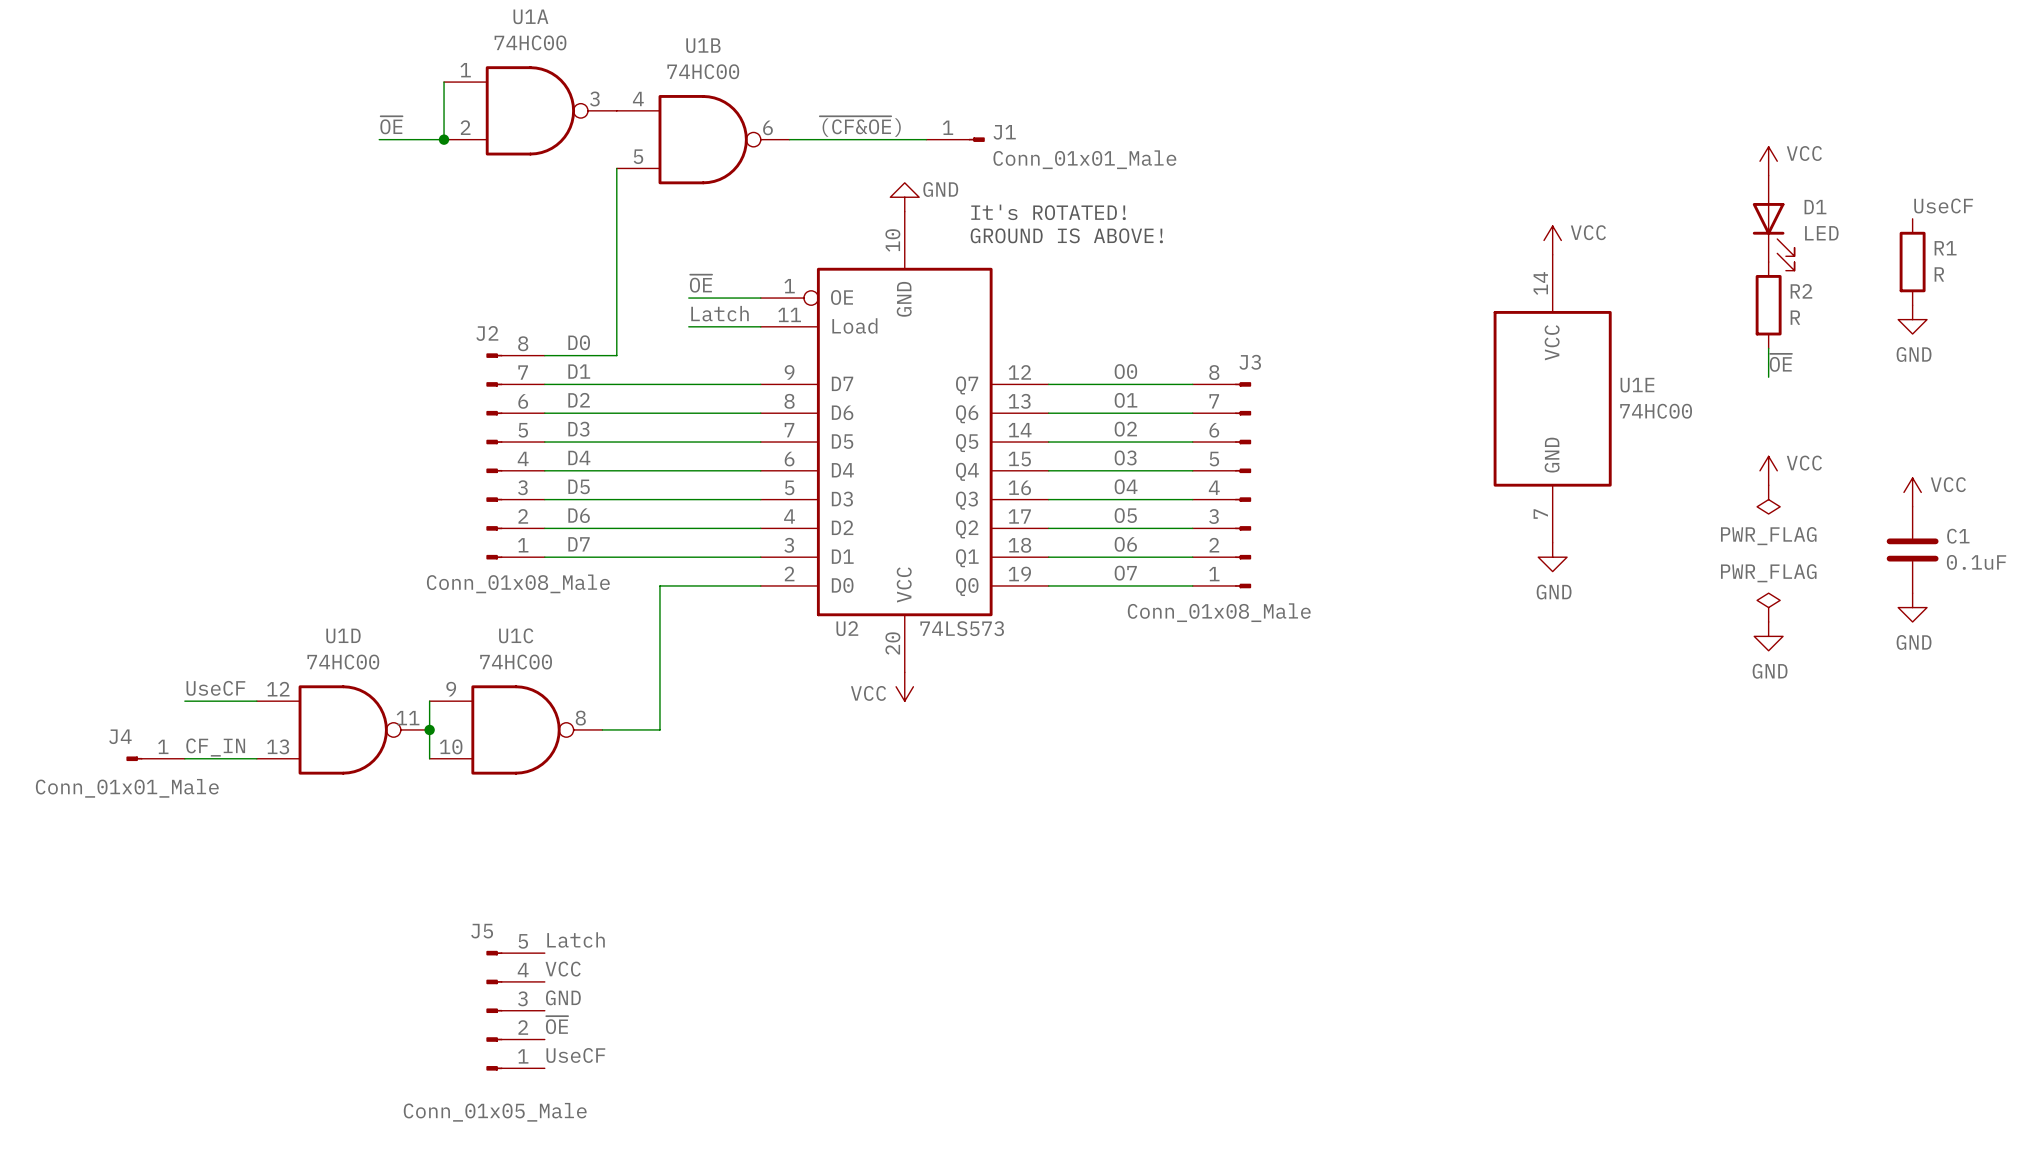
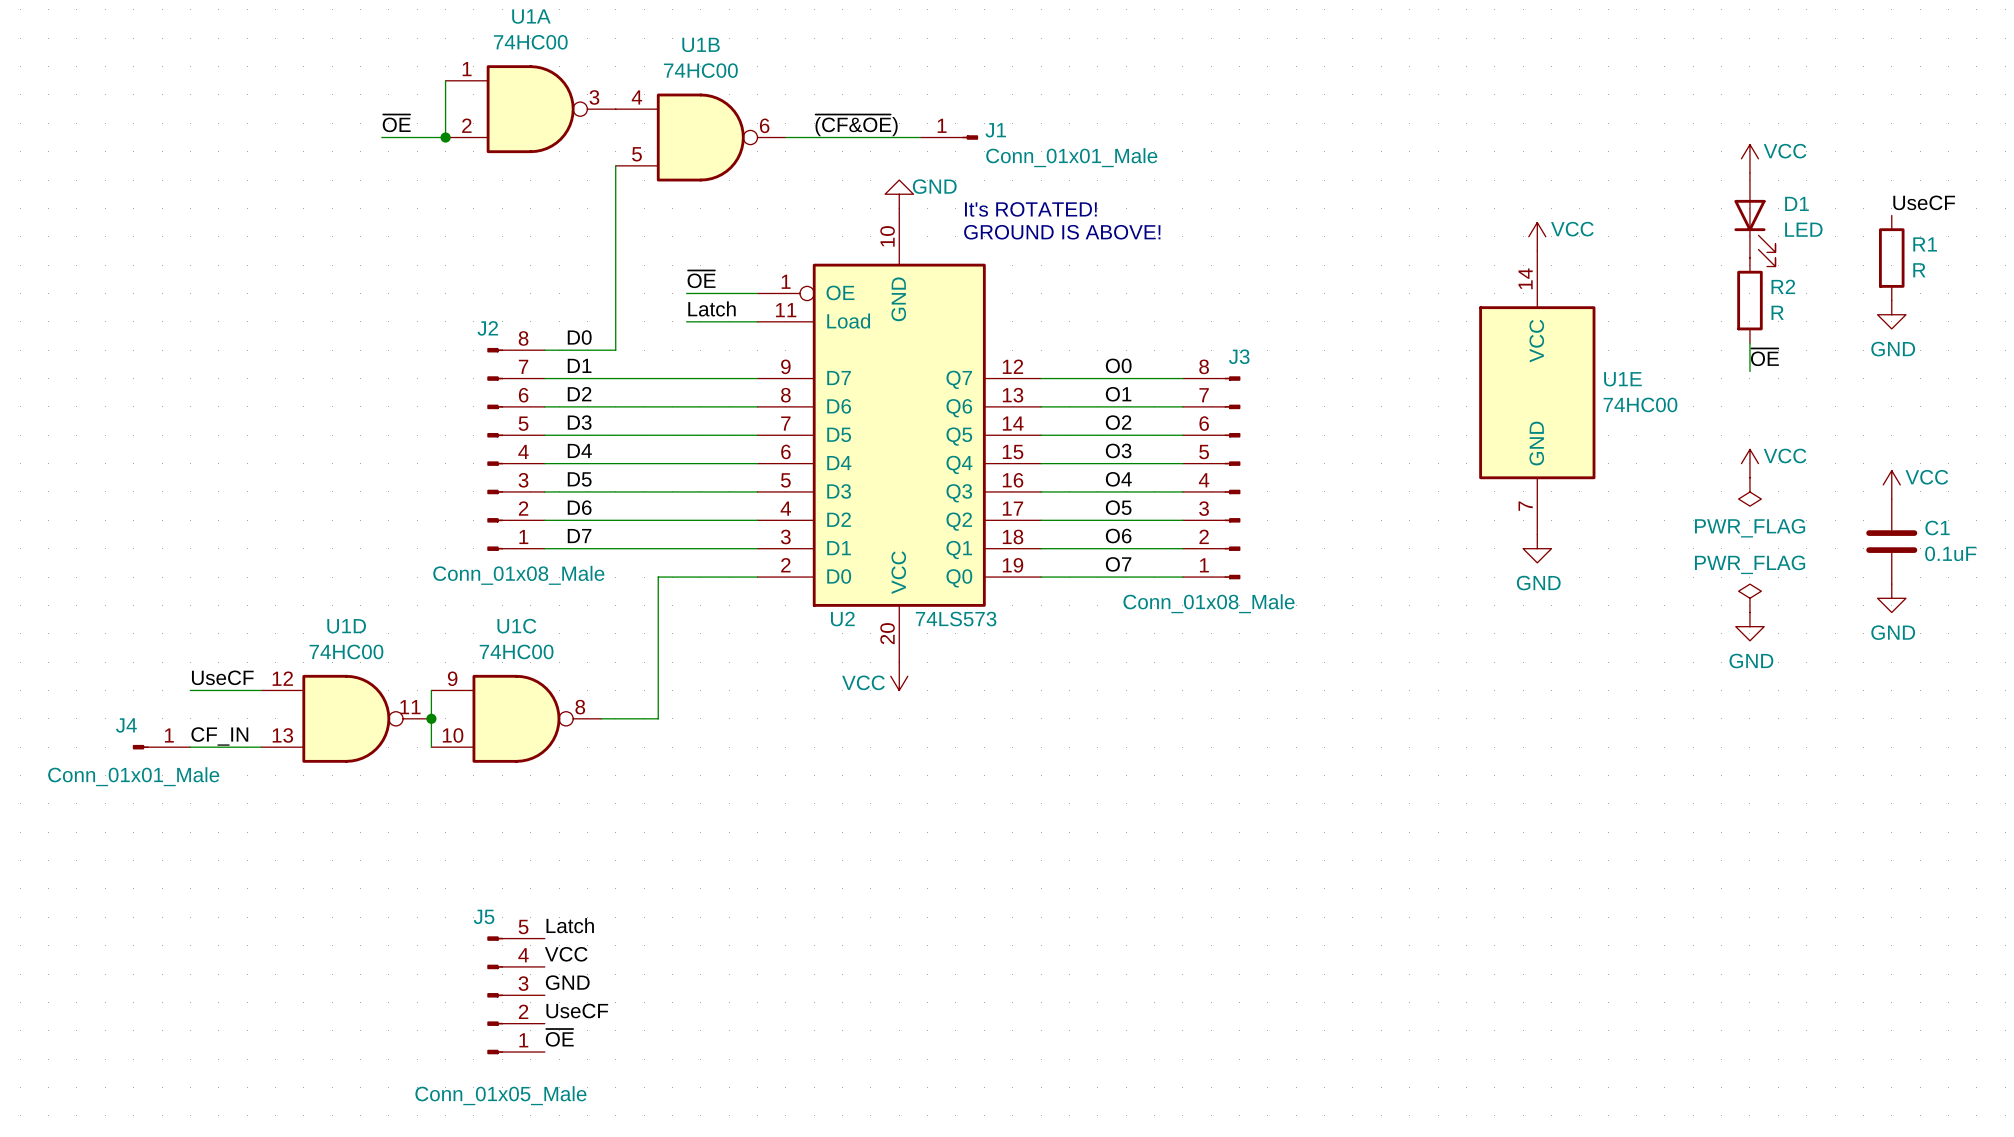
label: ~{OE} (557, 1025) -> UseCF (577, 1011)
label: UseCF (575, 1055) -> ~{OE} (559, 1037)

